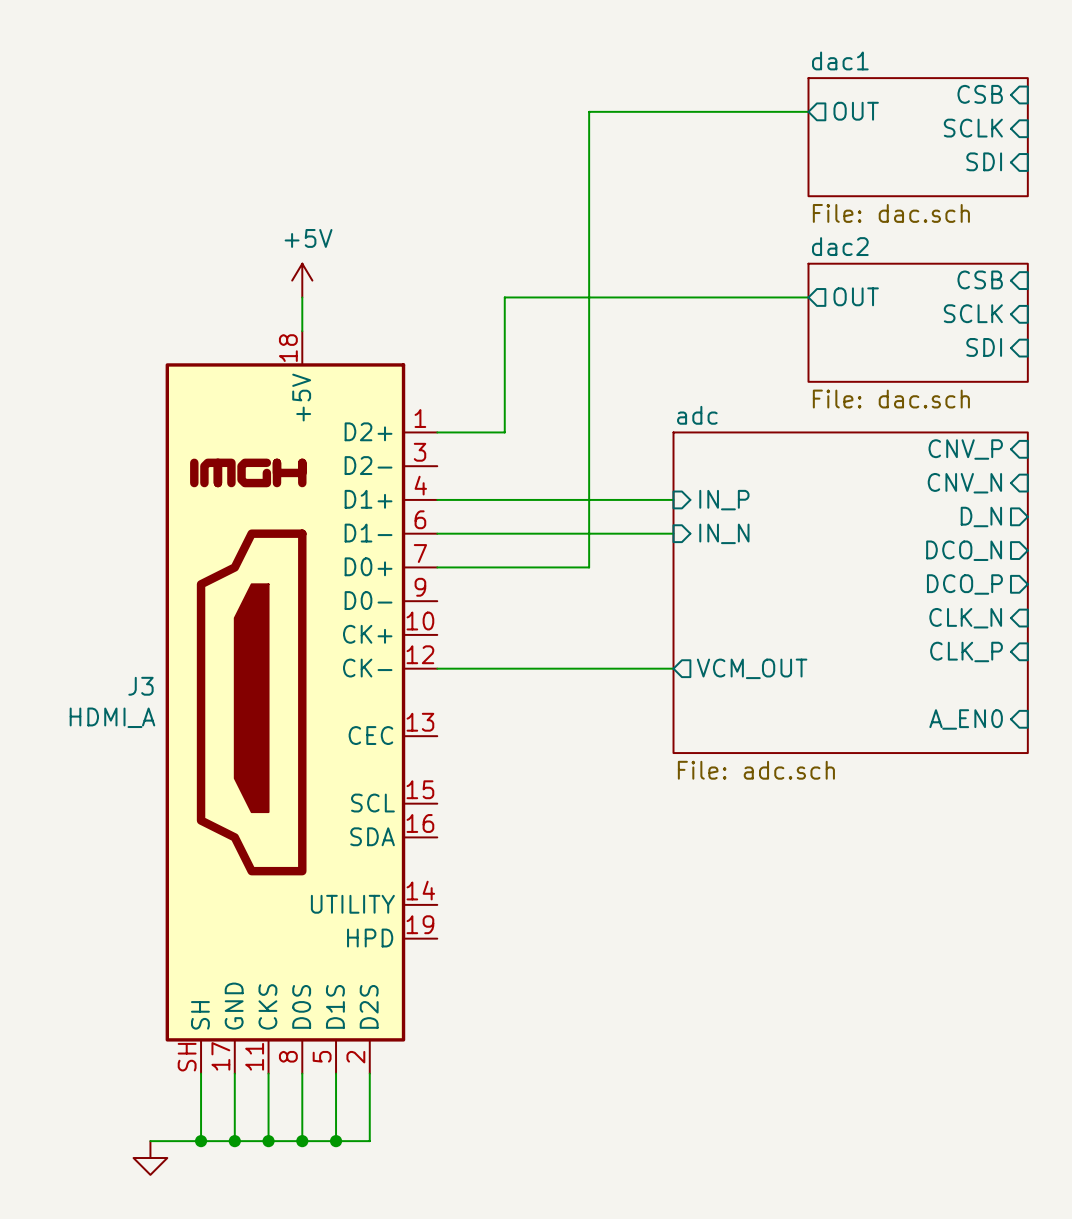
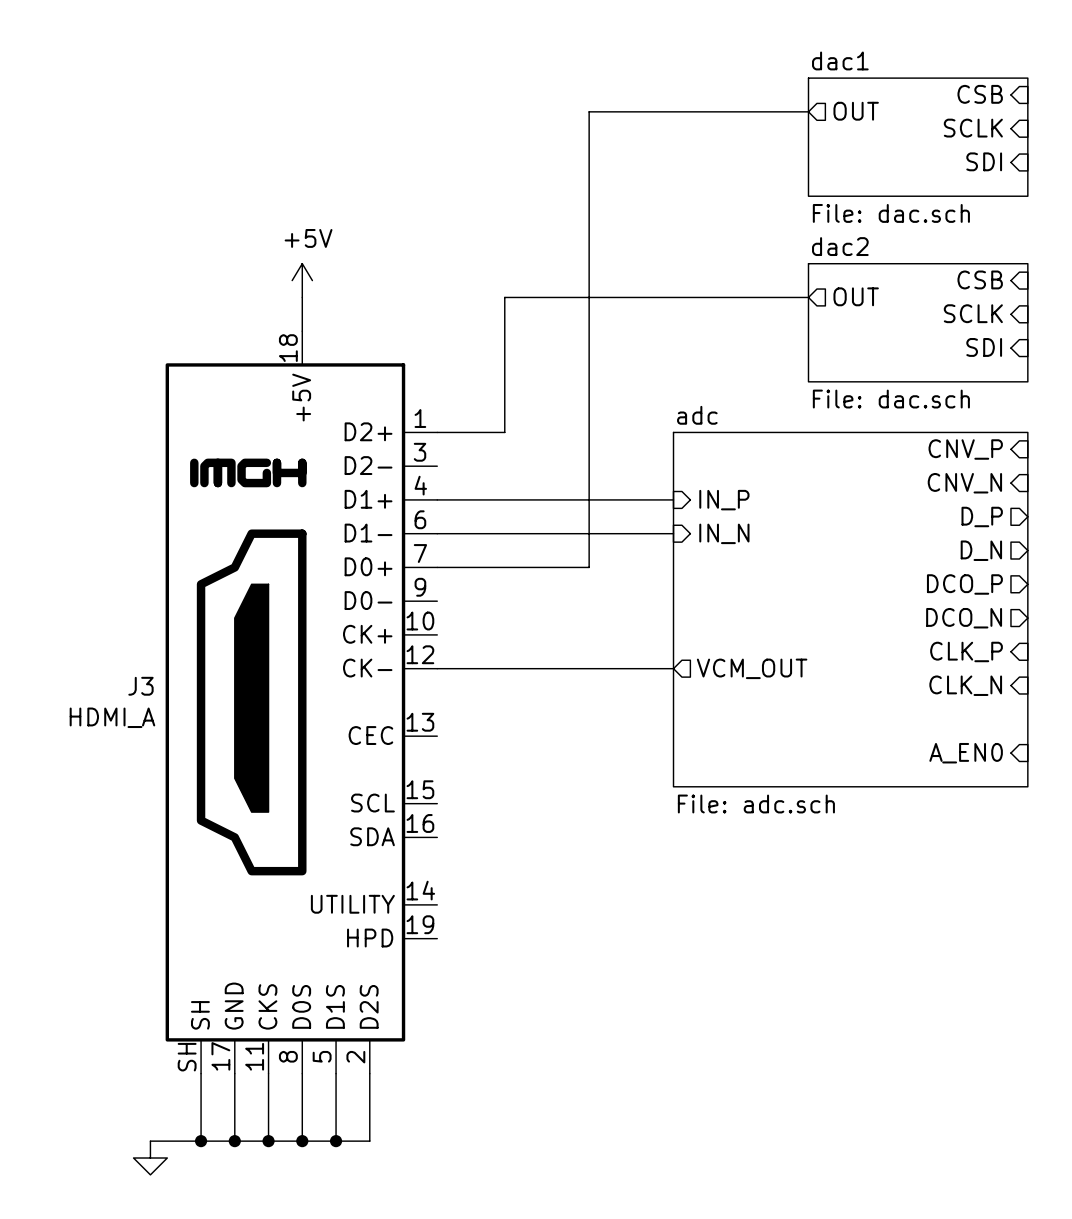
sheet pin: D_N (981, 516) -> D_P (982, 516)
sheet pin: DCO_N (964, 550) -> D_N (981, 550)
sheet adc: File: adc.sch (850, 592) -> none
sheet adc: none -> File: adc.sch (850, 609)
sheet pin shape: input (965, 618) -> output (964, 618)
sheet pin: CLK_N (965, 618) -> DCO_N (964, 618)
sheet pin: none -> CLK_N (965, 685)
sheet pin position: A_EN0 (966, 719) -> A_EN0 (966, 753)

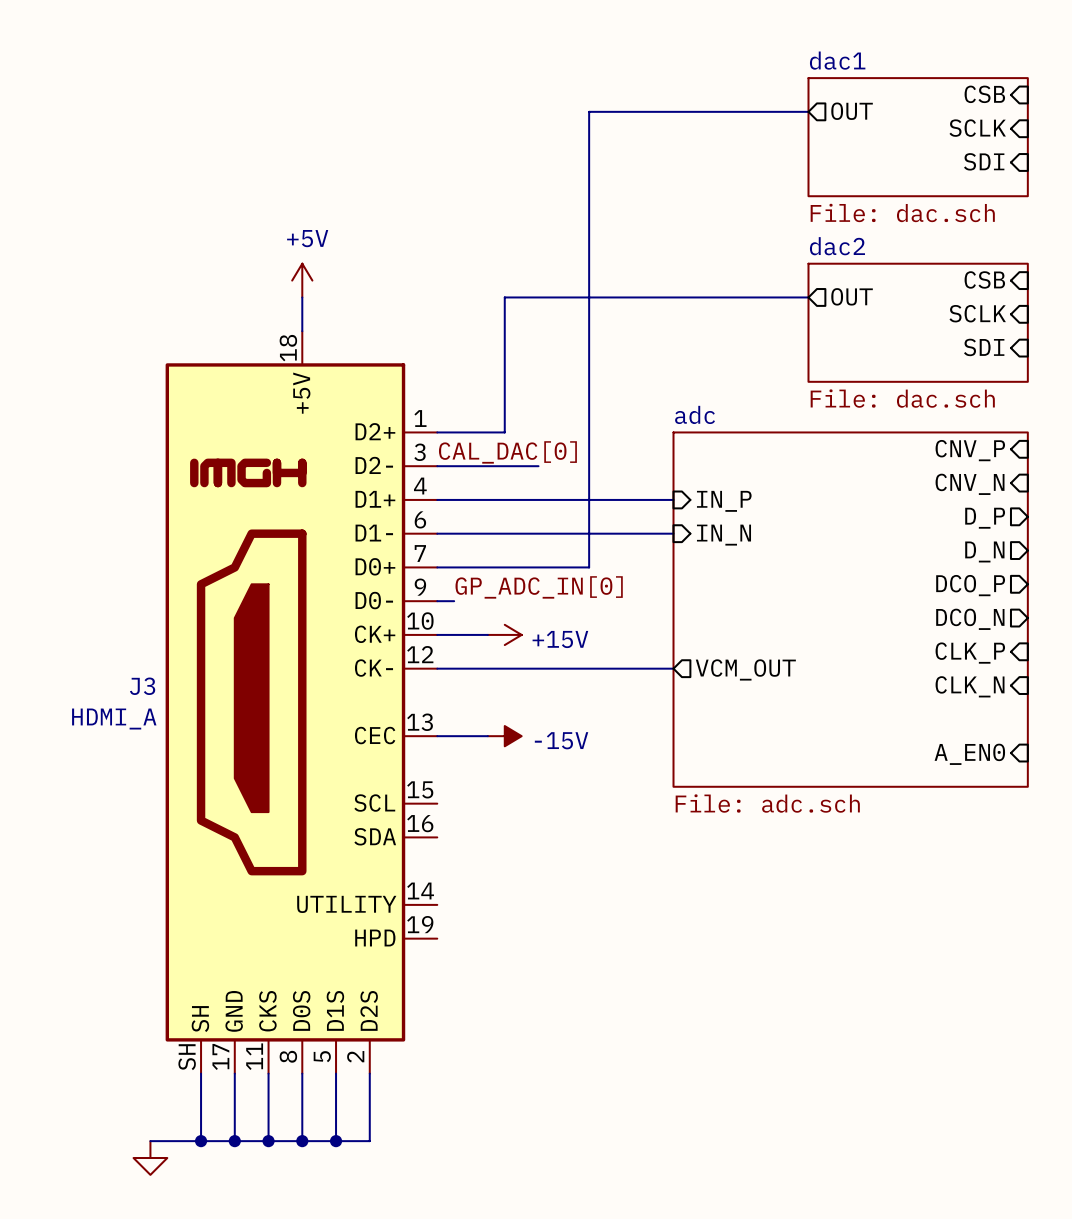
label: none -> CAL_DAC[0] (507, 452)
wire: none -> (437, 466) (538, 466)
label: none -> GP_ADC_IN[0] (539, 587)
wire: none -> (437, 601) (454, 601)
wire: none -> (437, 634) (487, 634)
power symbol: none -> +15V (504, 634)
wire: none -> (437, 736) (487, 736)
power symbol: none -> -15V (504, 736)

